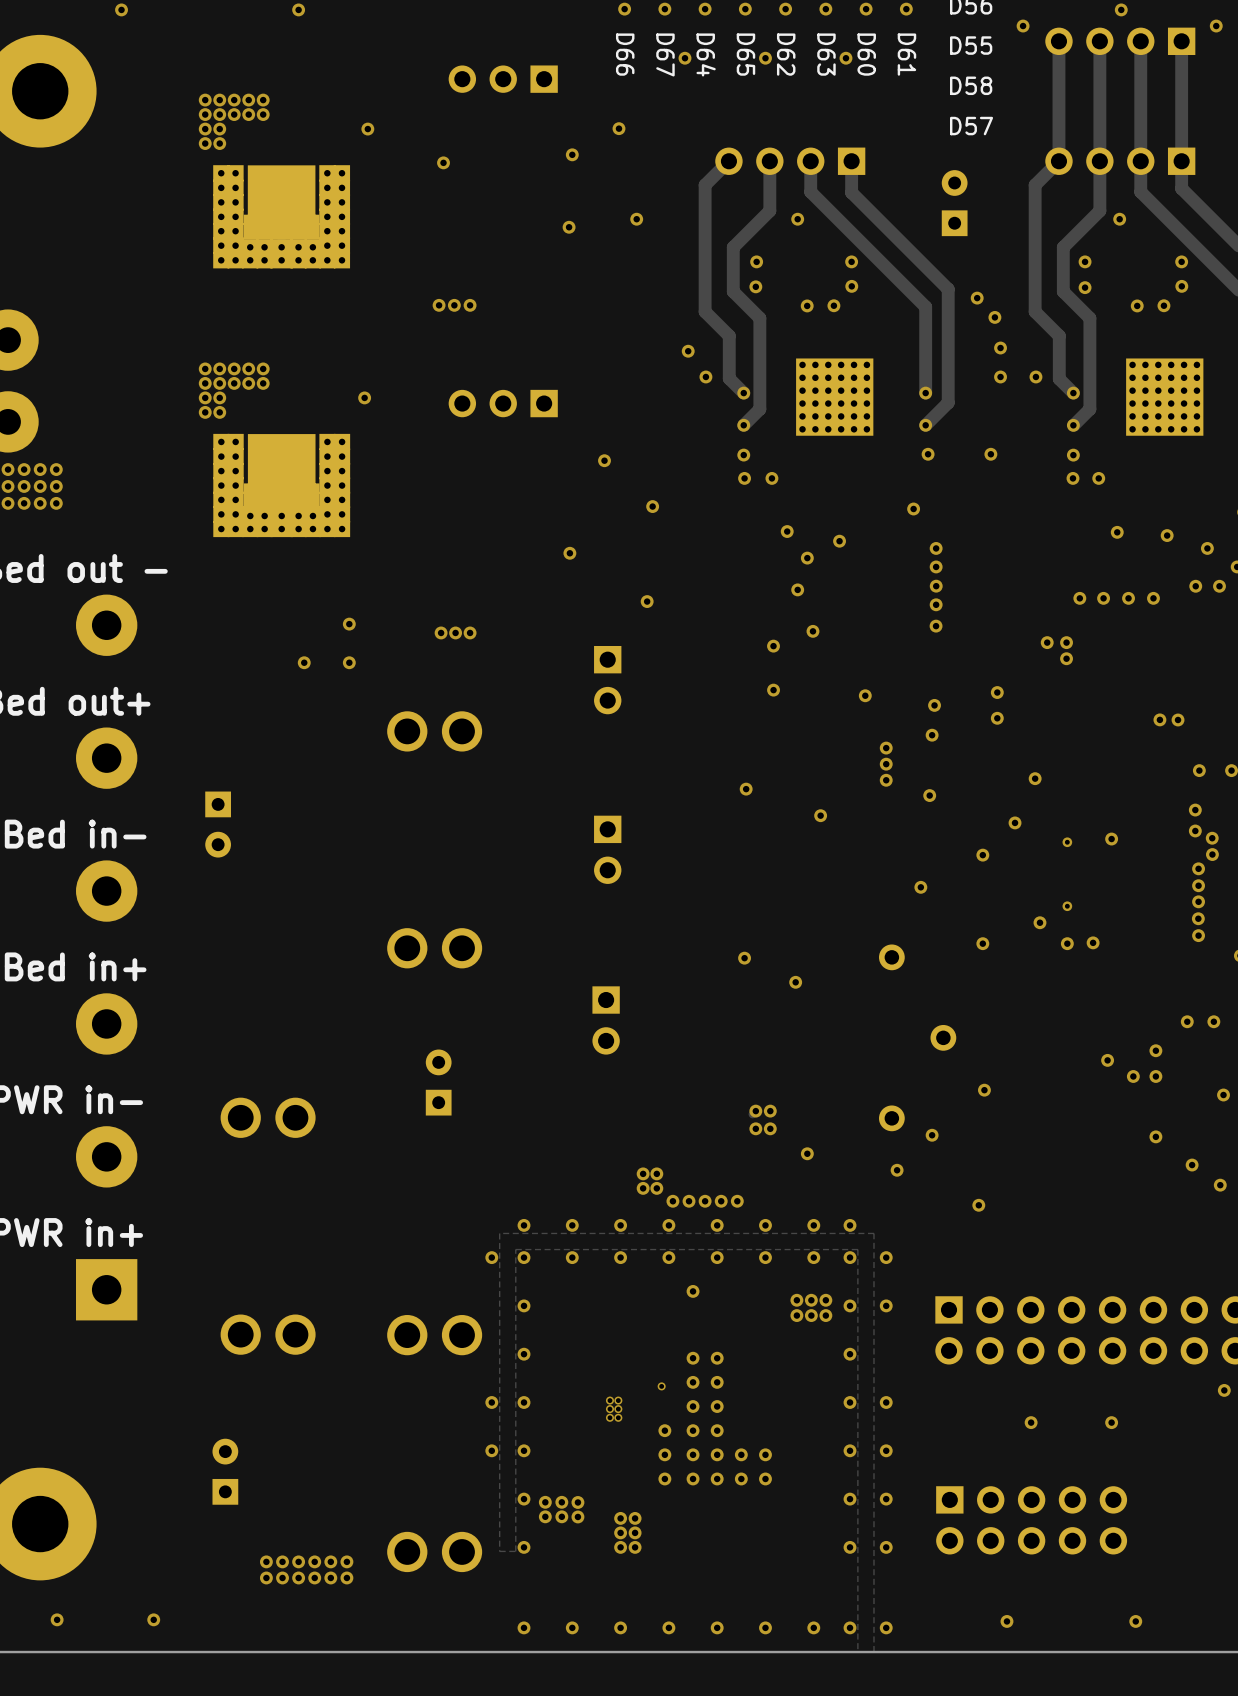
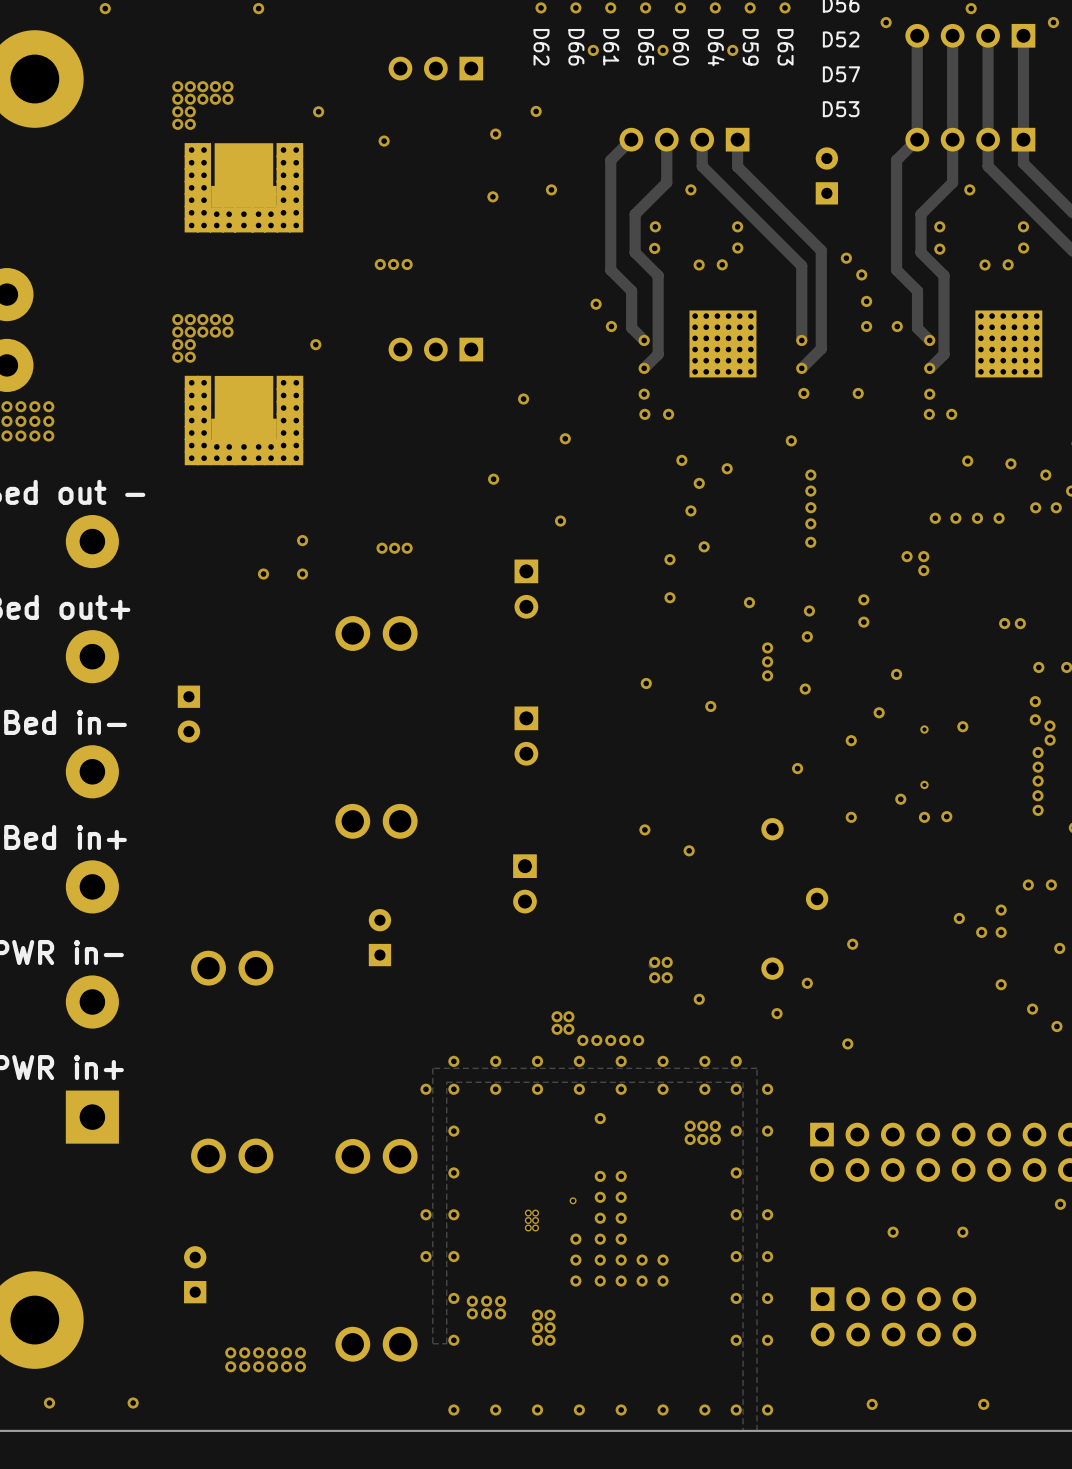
D55 name: D55 (971, 45) -> D52 (841, 39)
D66 name: D66 (625, 54) -> D62 (541, 47)
D67 name: D67 (665, 54) -> D66 (576, 47)
D64 name: D64 (706, 54) -> D61 (611, 47)
D62 name: D62 (786, 54) -> D60 (680, 47)
D63 name: D63 (826, 54) -> D64 (716, 47)
D60 name: D60 (866, 54) -> D59 (750, 47)
D61 name: D61 (906, 54) -> D63 (785, 47)
D58 name: D58 (971, 85) -> D57 (841, 74)
D57 name: D57 (971, 126) -> D53 (841, 109)

